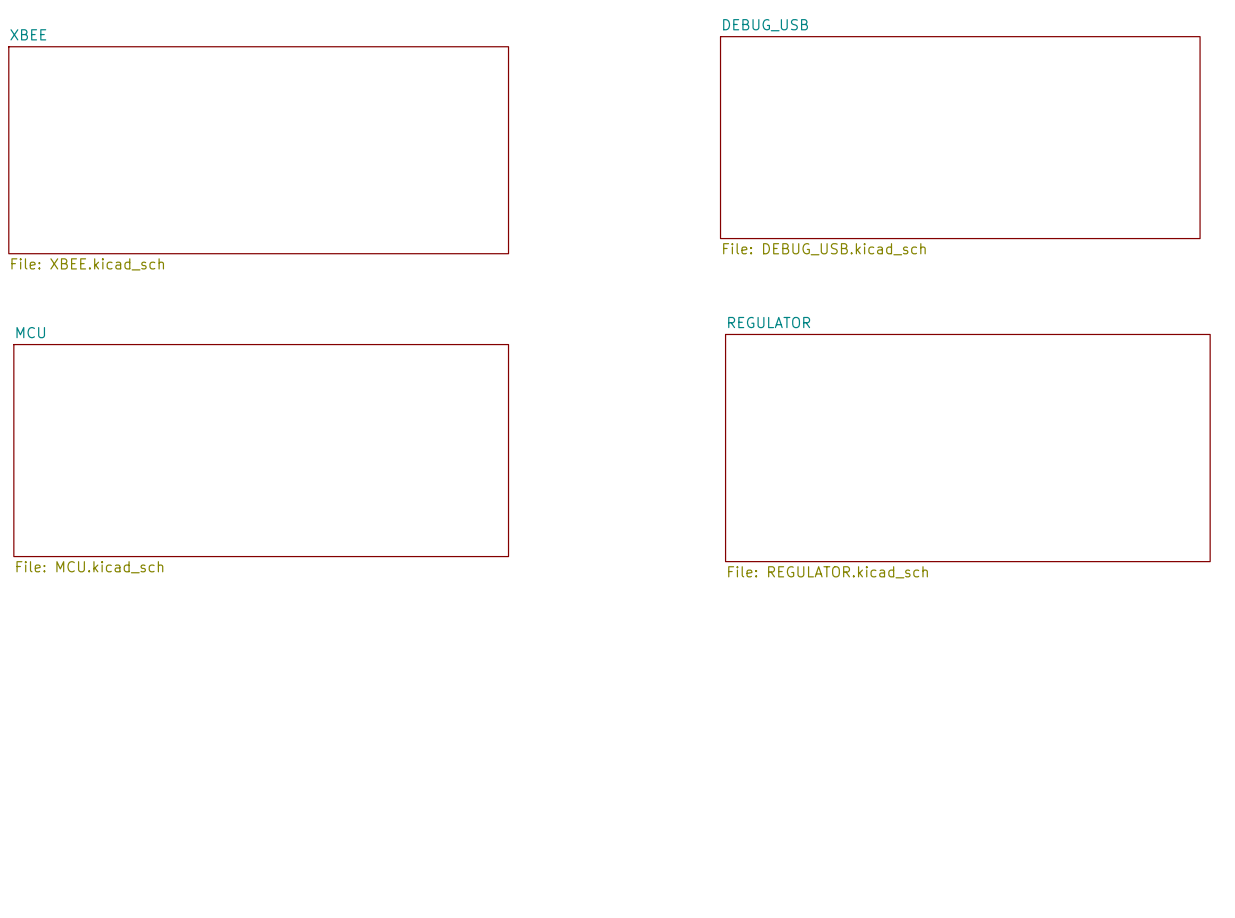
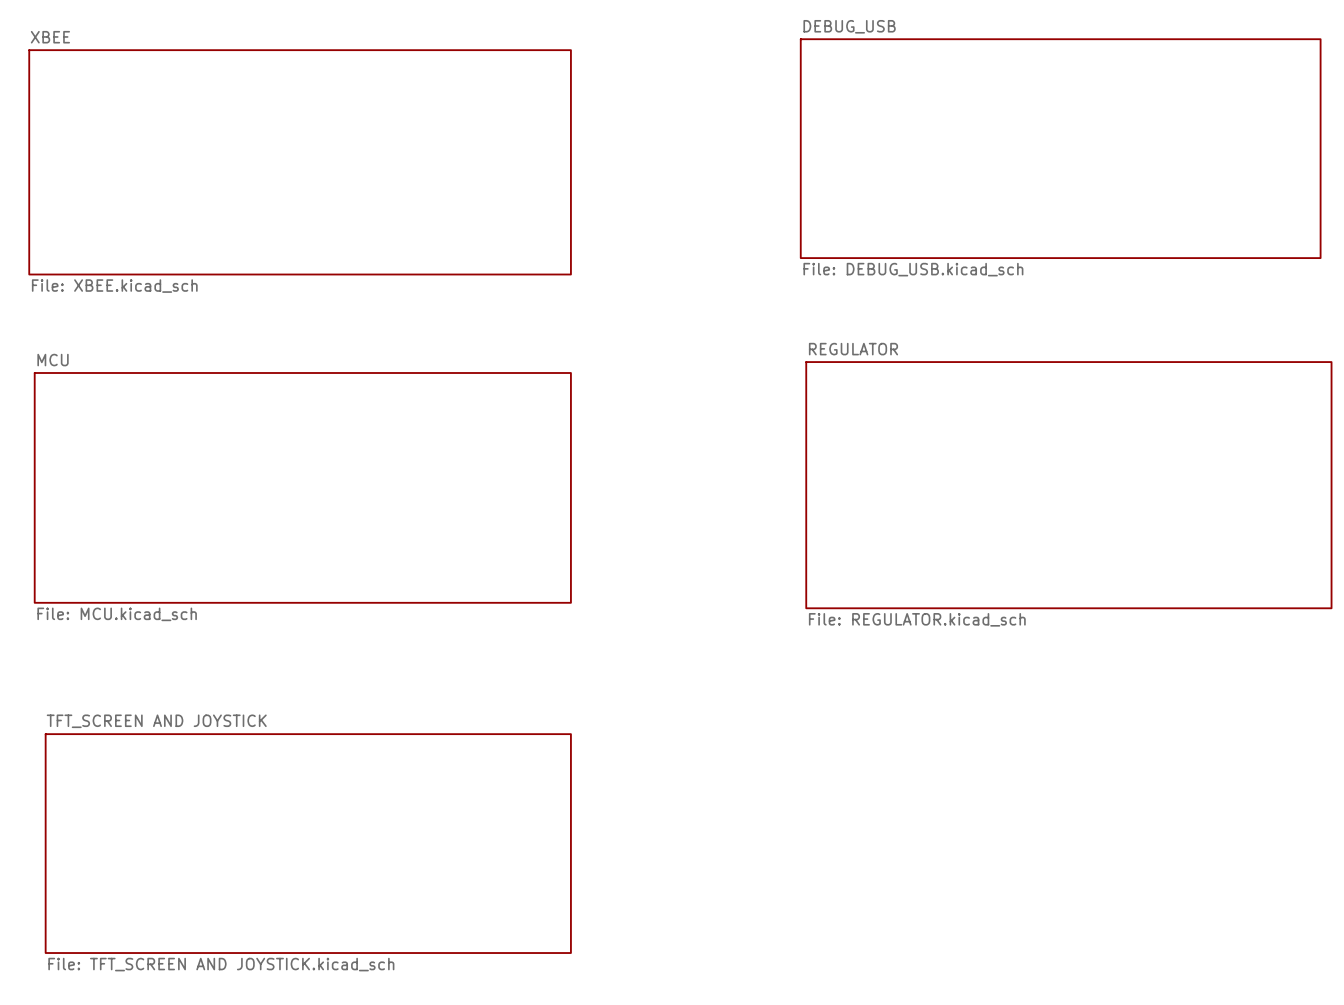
sheet TFT_SCREEN AND JOYSTICK: none -> File: TFT_SCREEN AND JOYSTICK.kicad_sch (308, 843)

